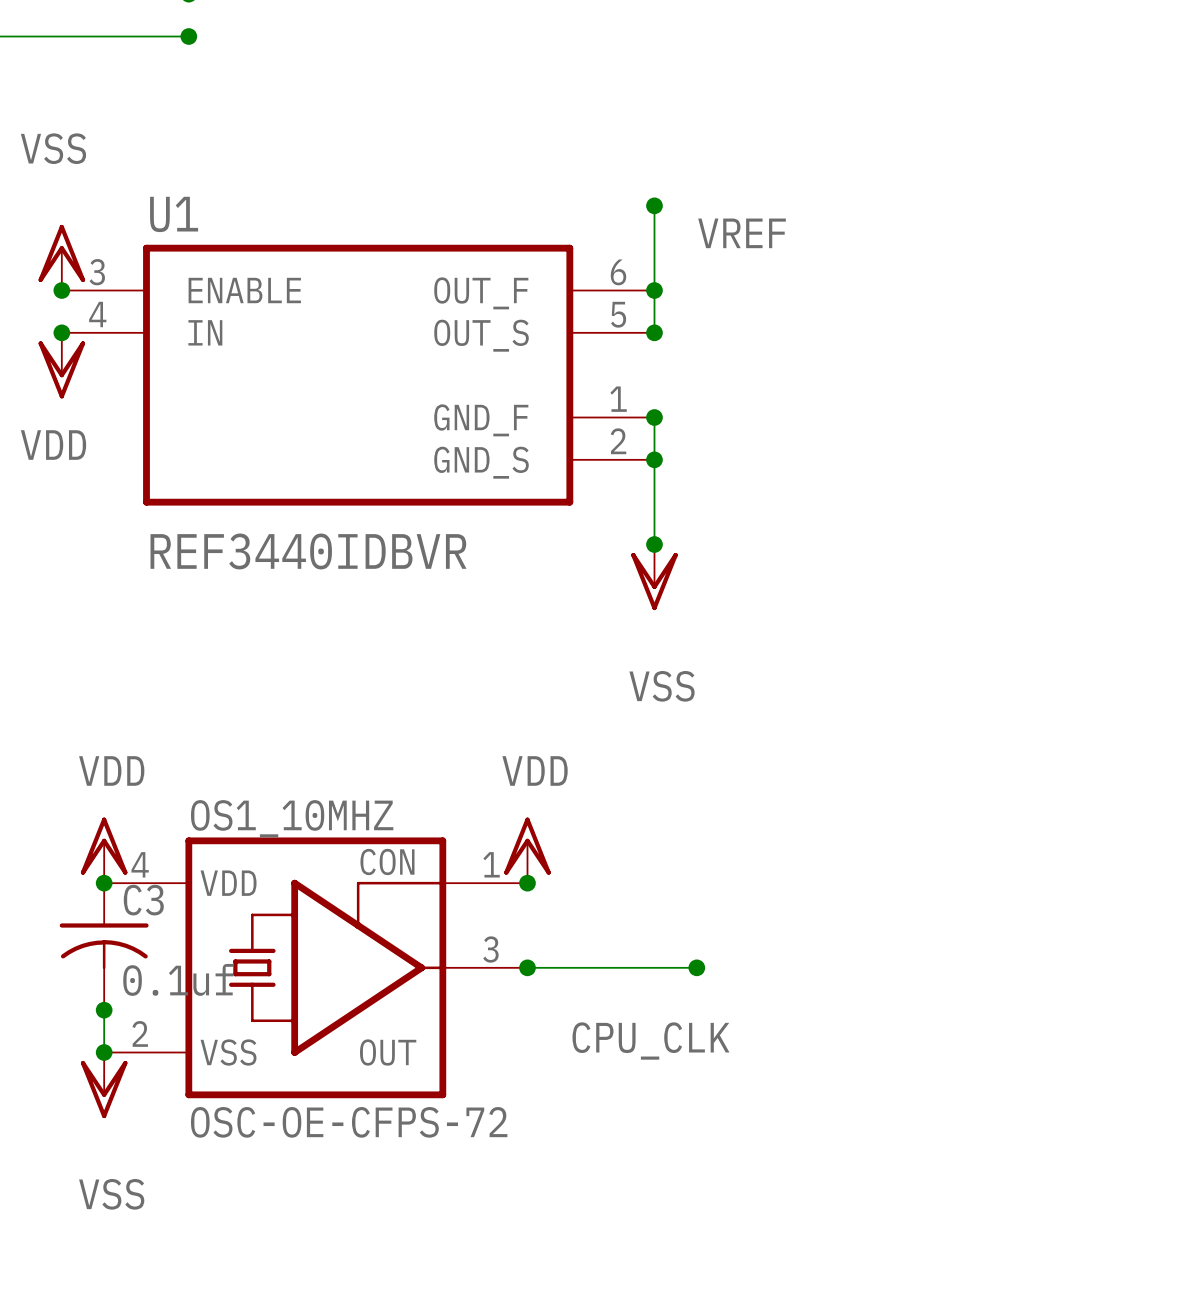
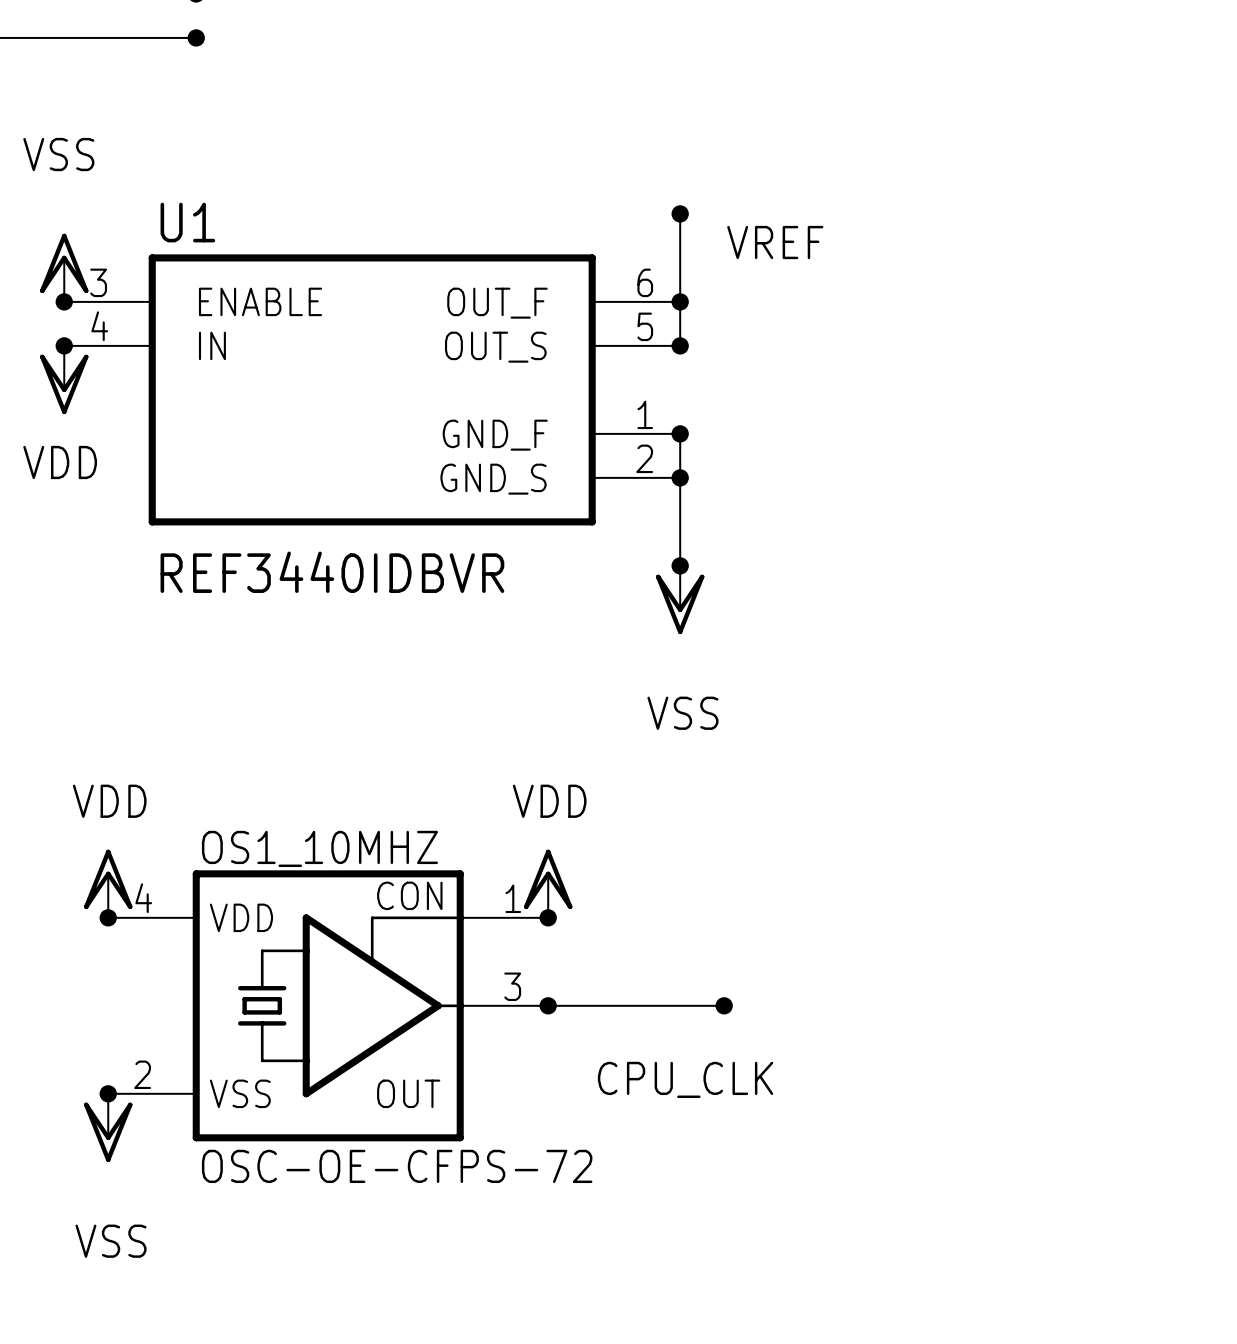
C3: 0.1uf (104, 946) -> none
wire: (104, 1010) (104, 1052) -> none
junction: (104, 1010) -> none

